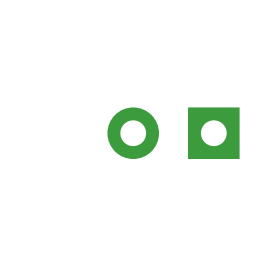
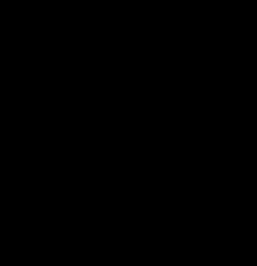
part: (173, 133) -> none

